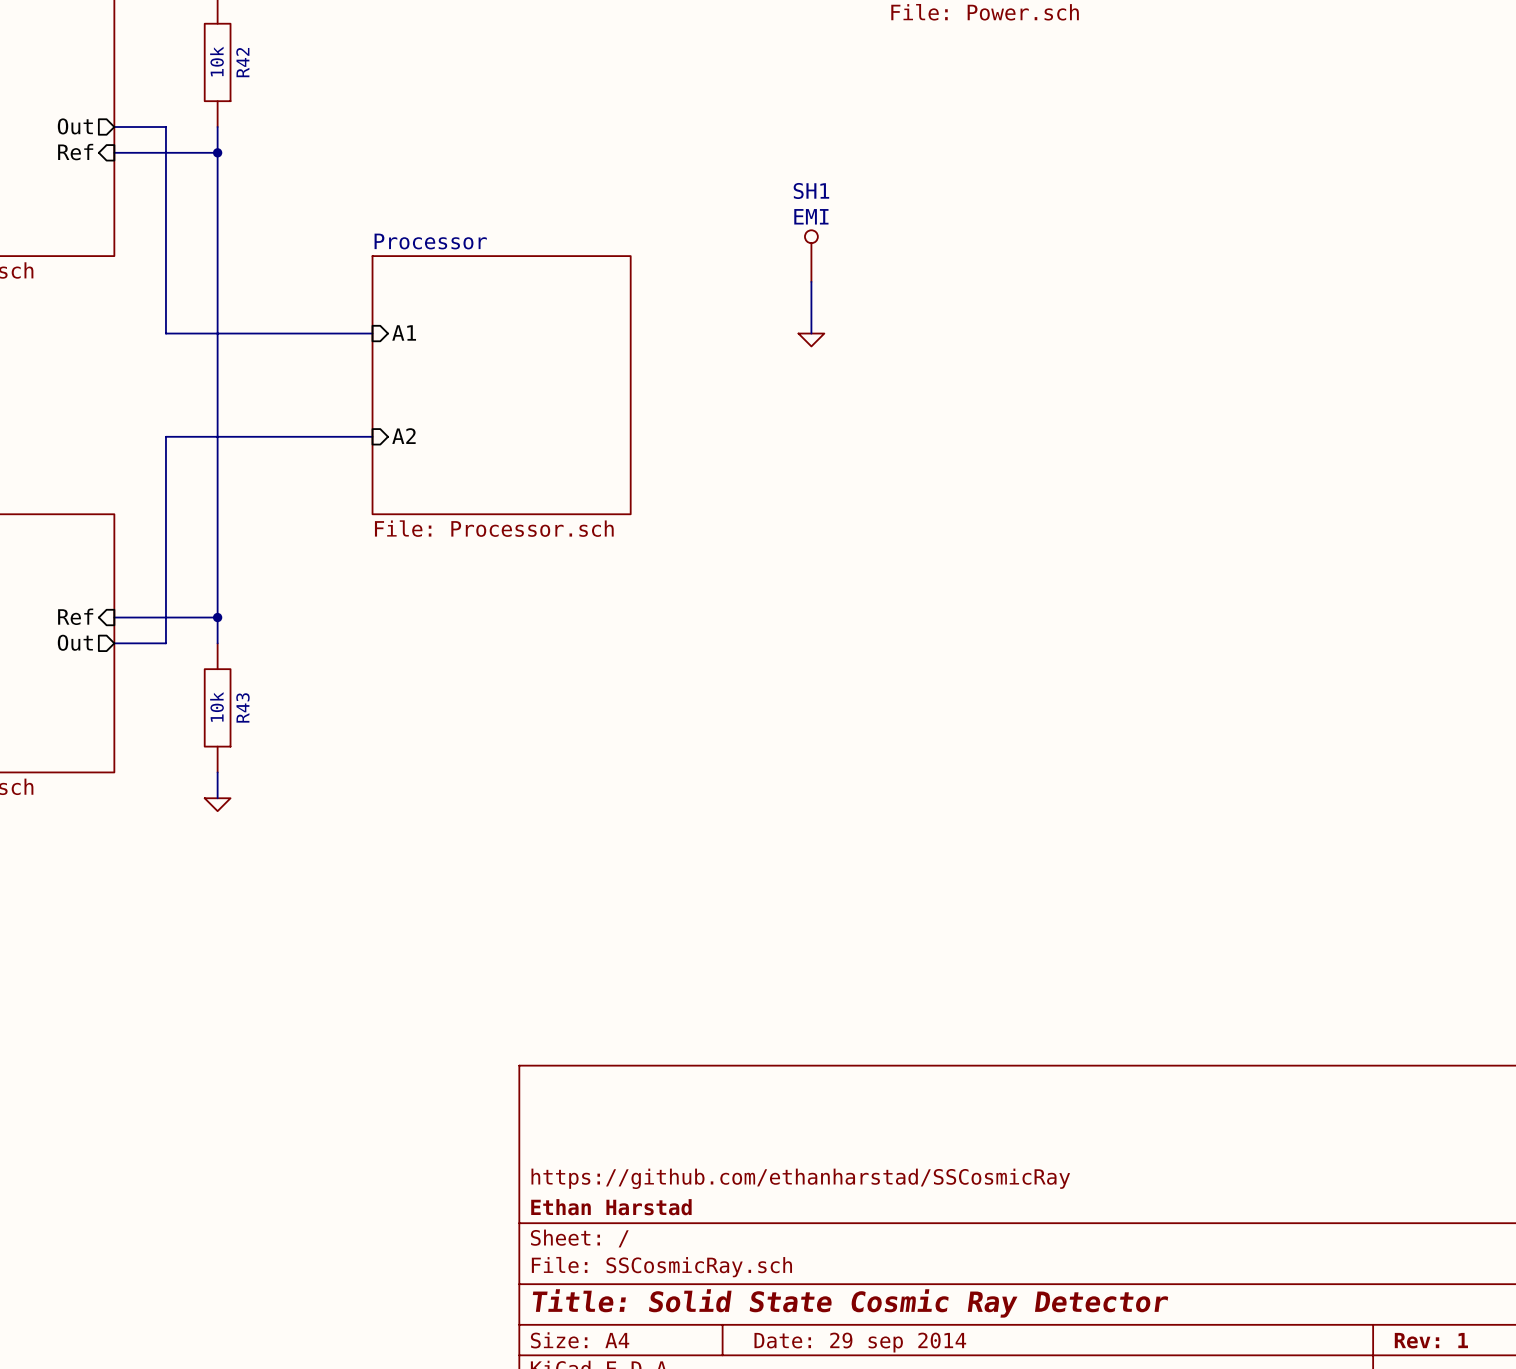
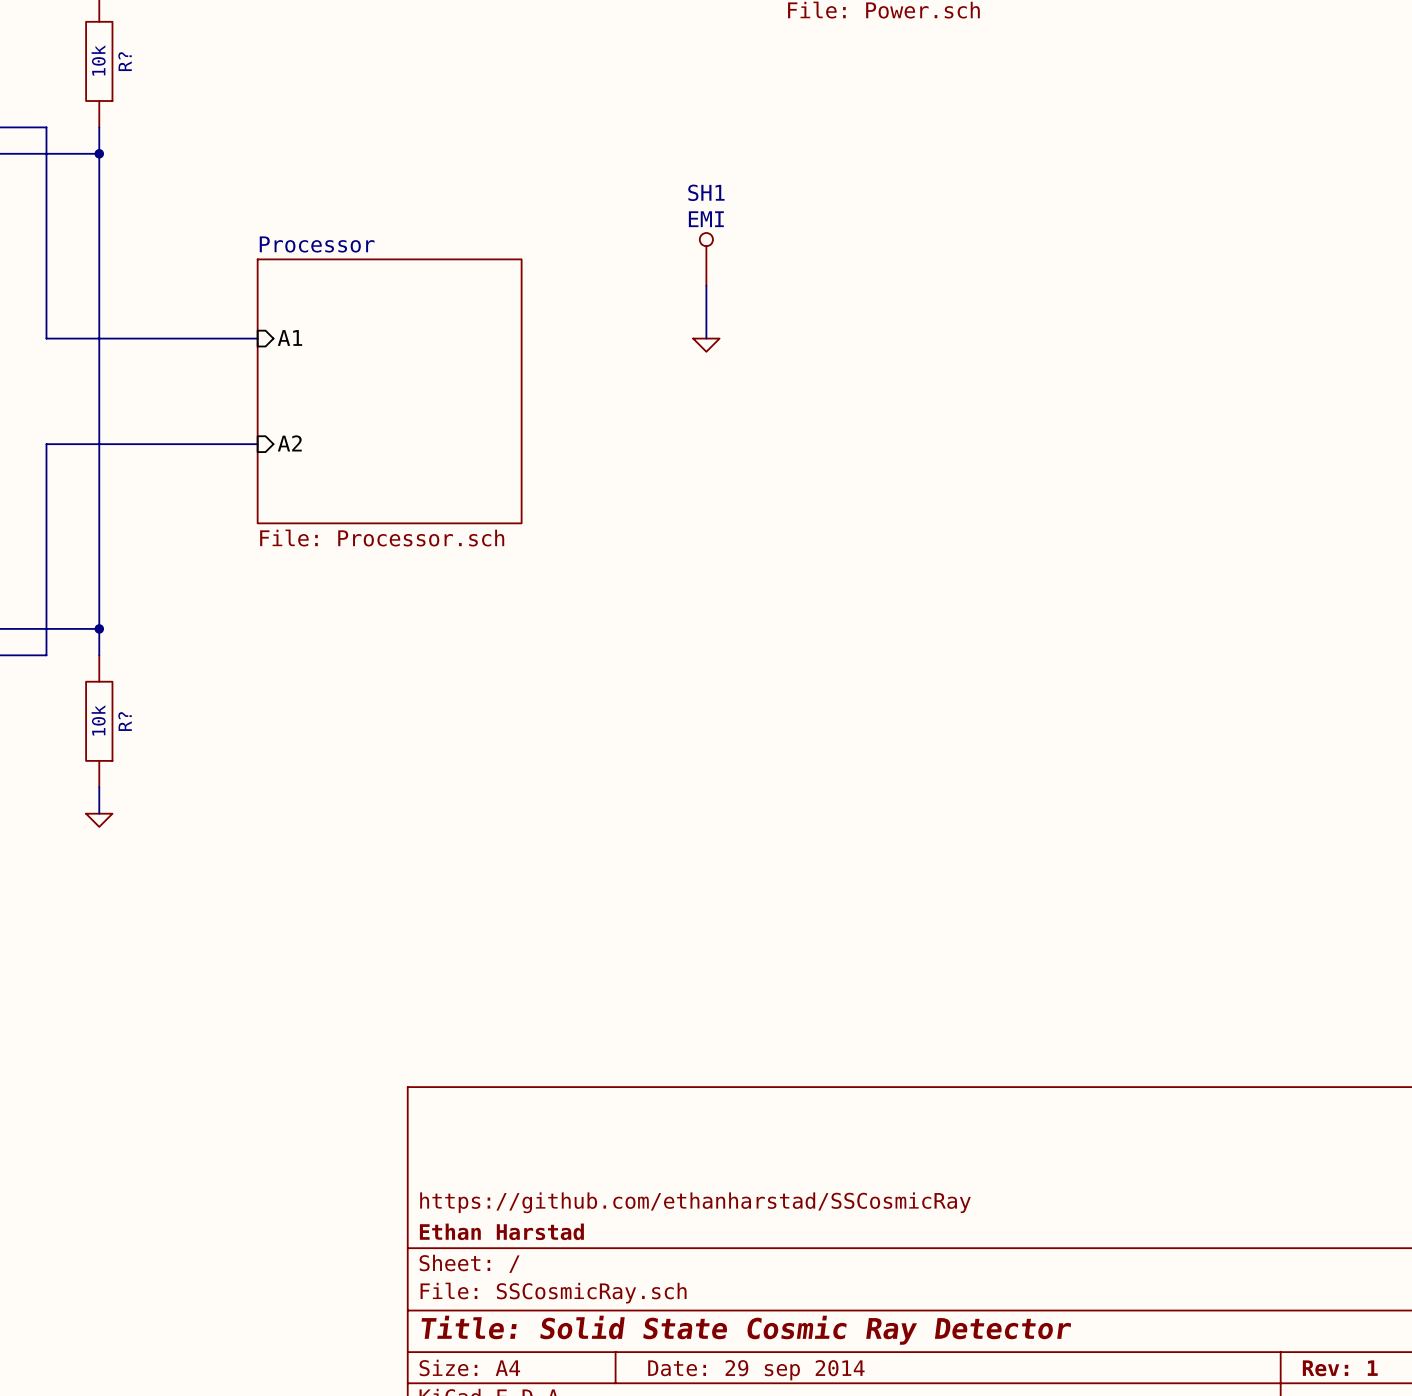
R42 name: R42 (242, 62) -> R? (125, 61)
R43 name: R43 (242, 707) -> R? (125, 721)

